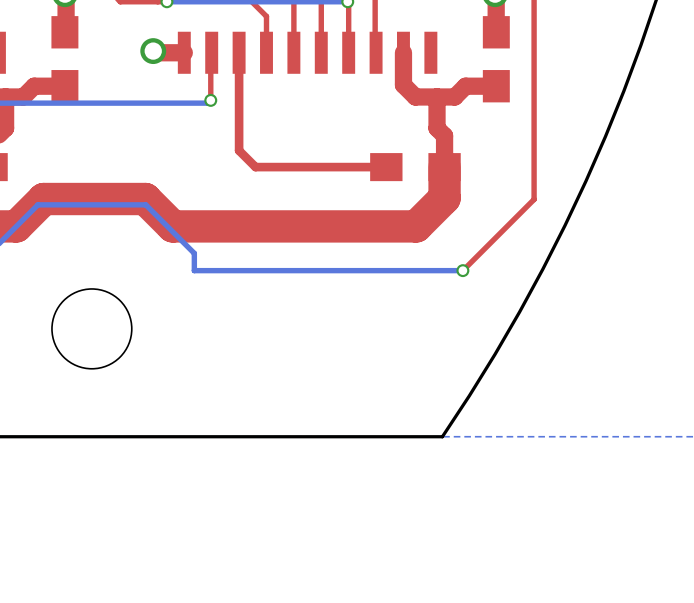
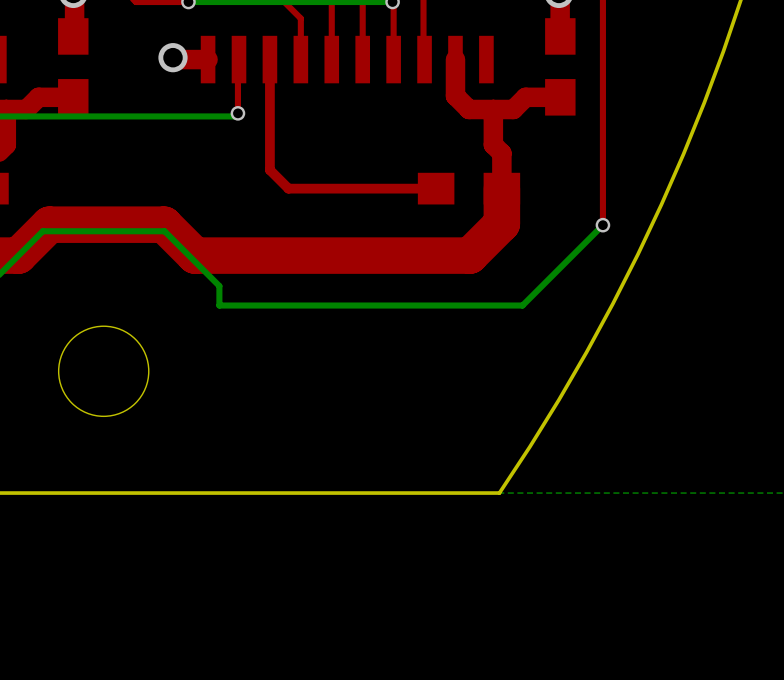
top track: (534, 199) (462, 270) -> none
bottom track: none -> (602, 225) (522, 305)
via position: (462, 270) -> (602, 225)

